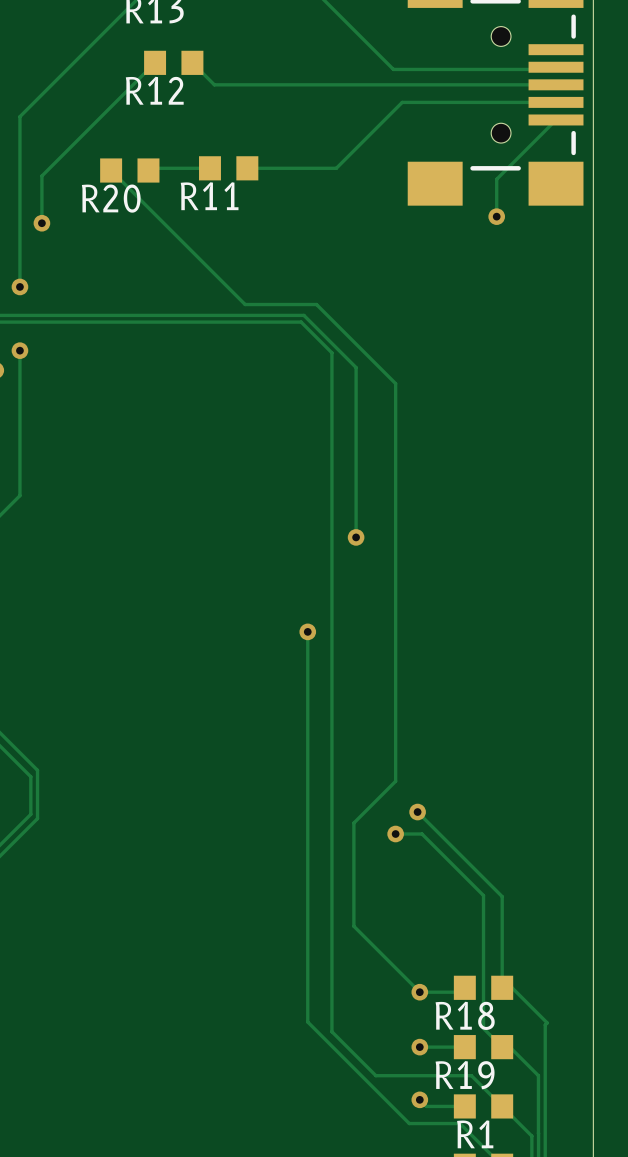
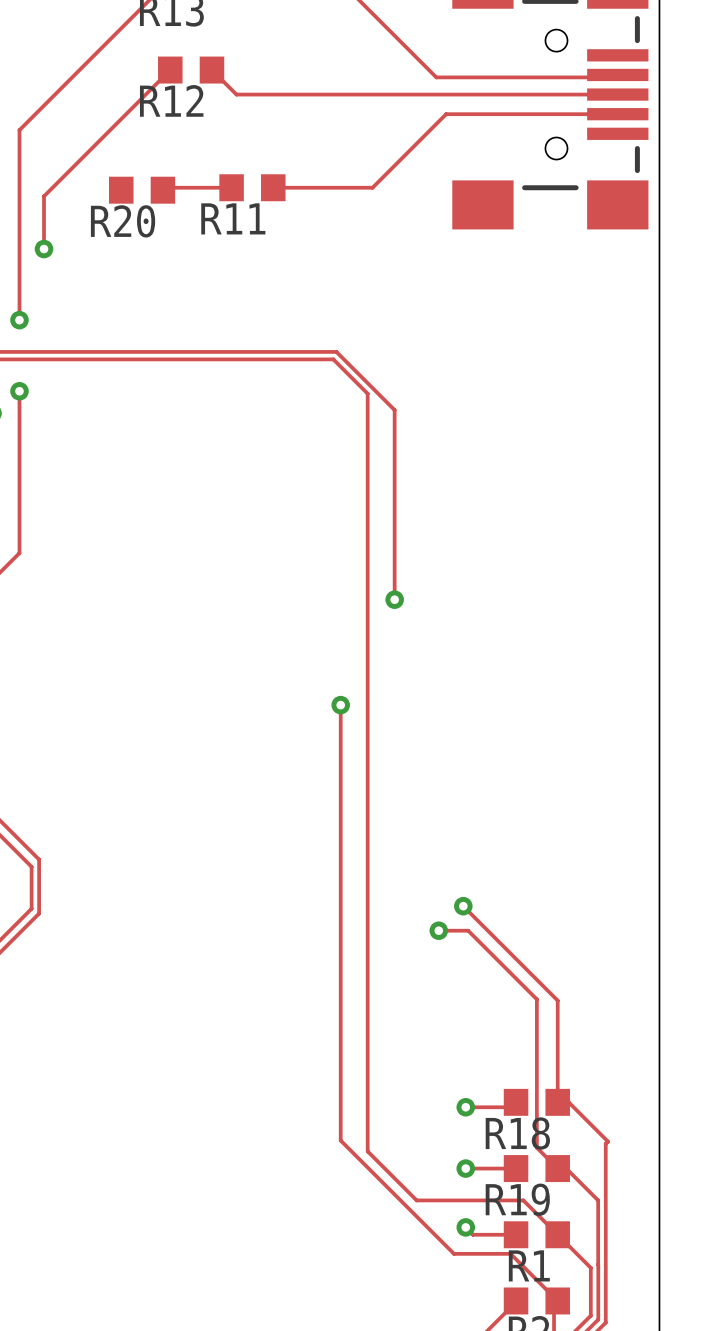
track: (556, 119) (496, 179) (496, 216) -> none
track: (111, 170) (245, 304) (316, 304) (395, 383) (395, 781) (353, 823) (353, 926) (419, 992) -> none
via: (496, 216) -> none

